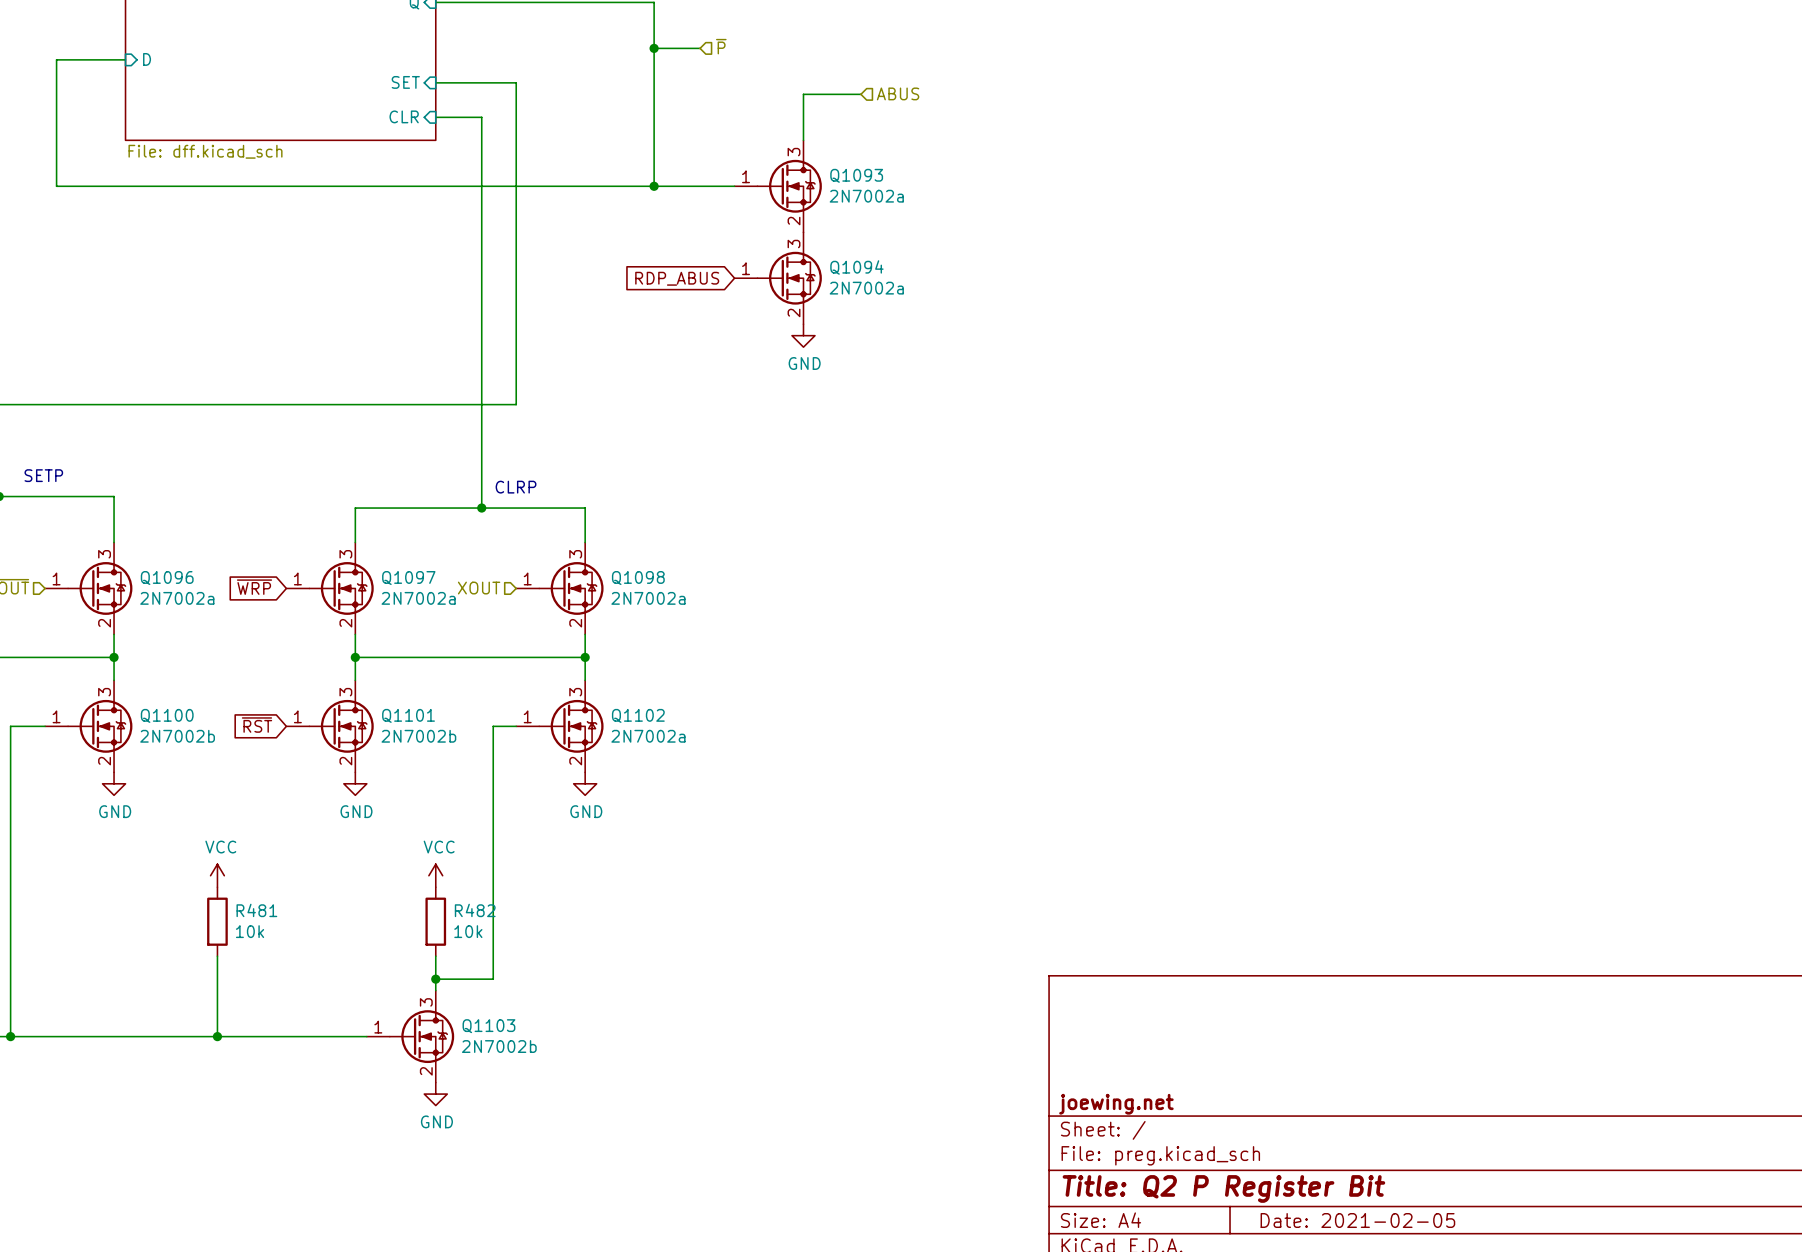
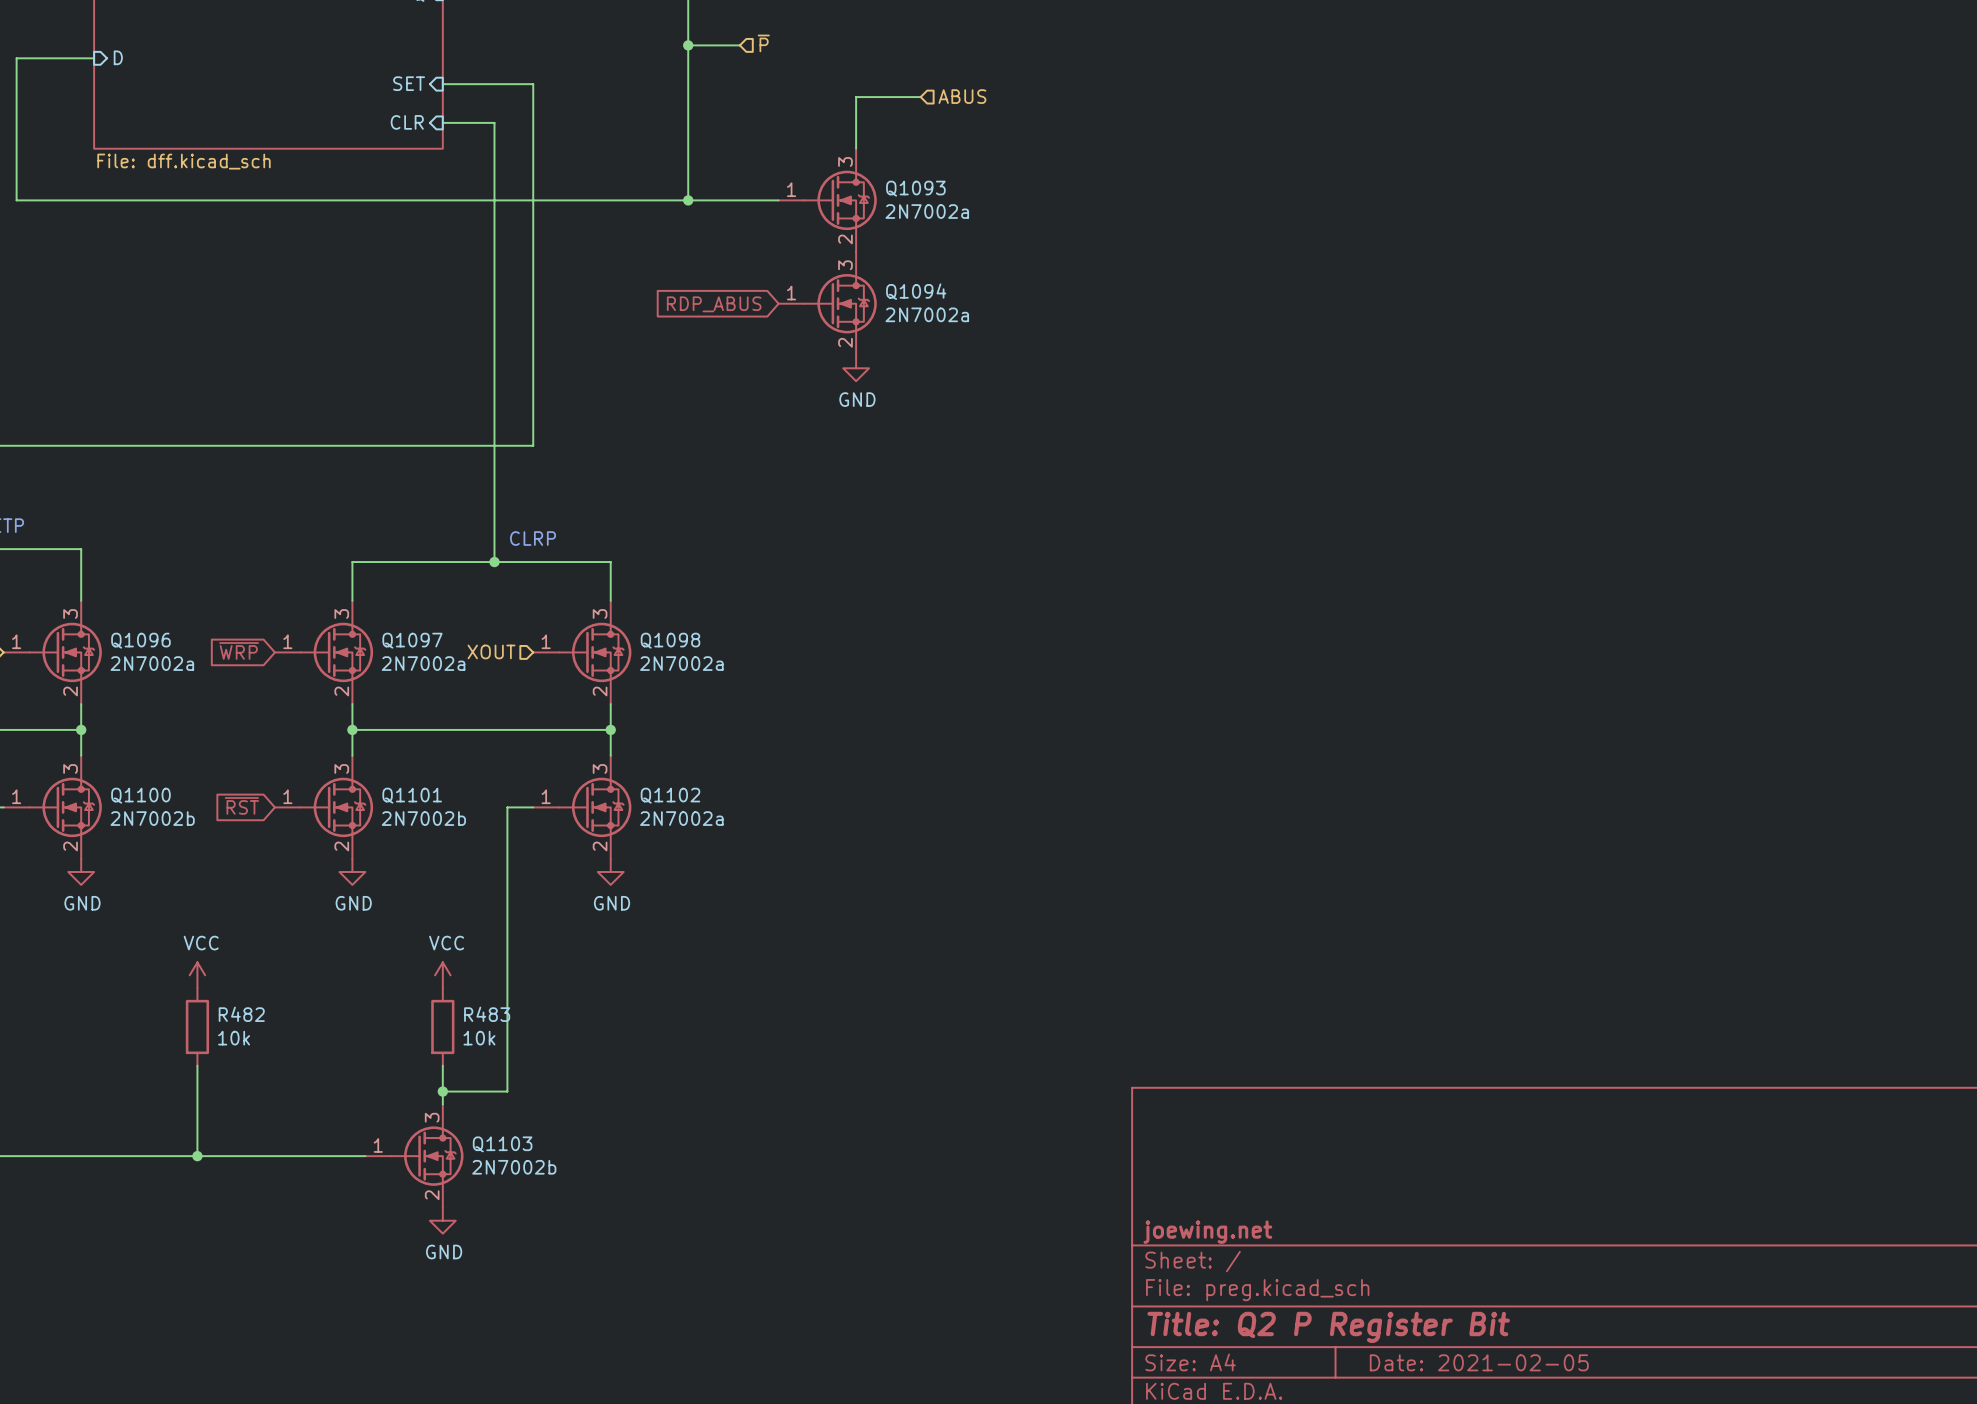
R481 name: R481 (256, 910) -> R482 (241, 1014)
R482 name: R482 (475, 910) -> R483 (487, 1014)

